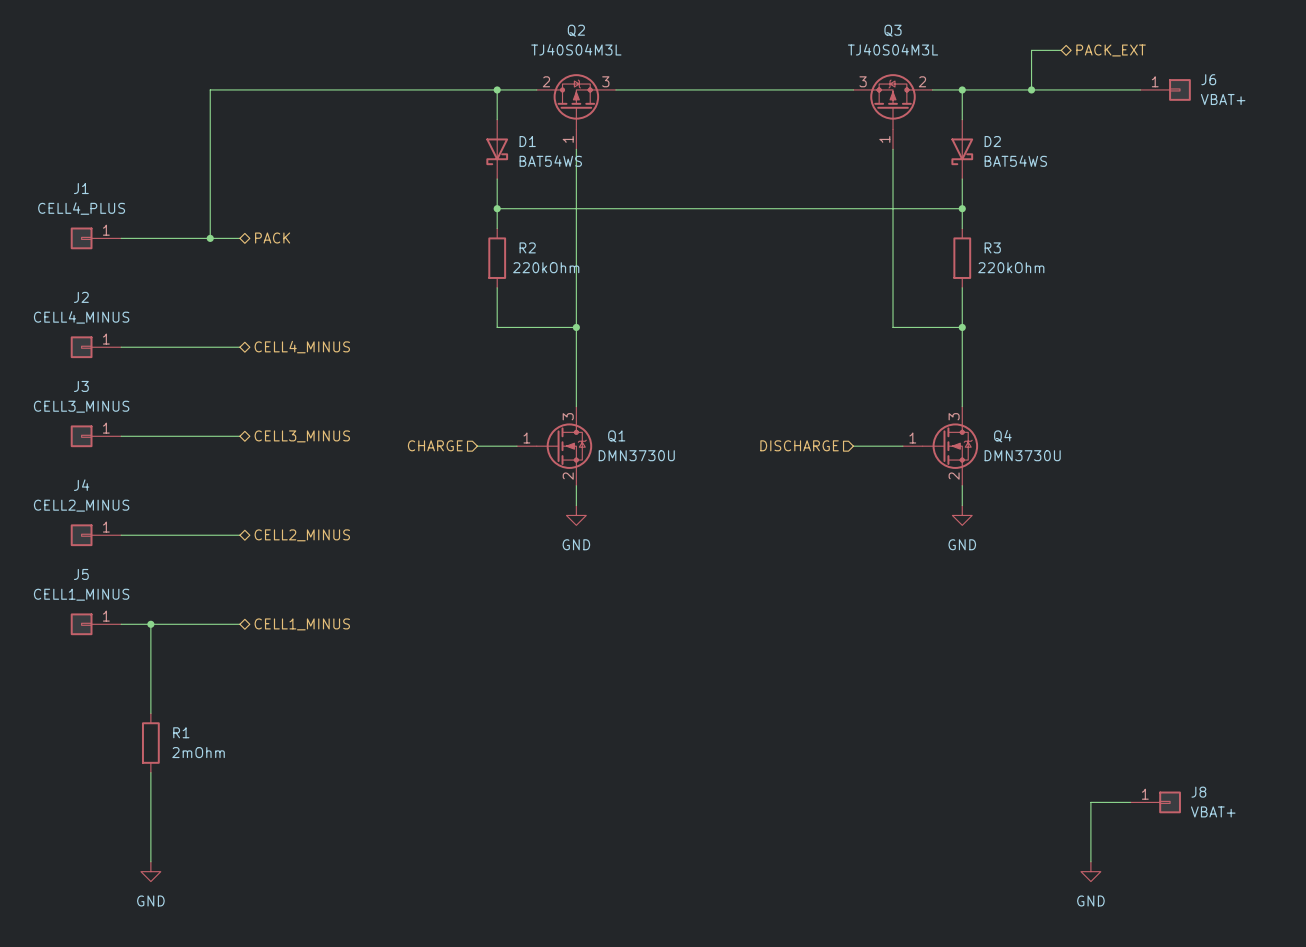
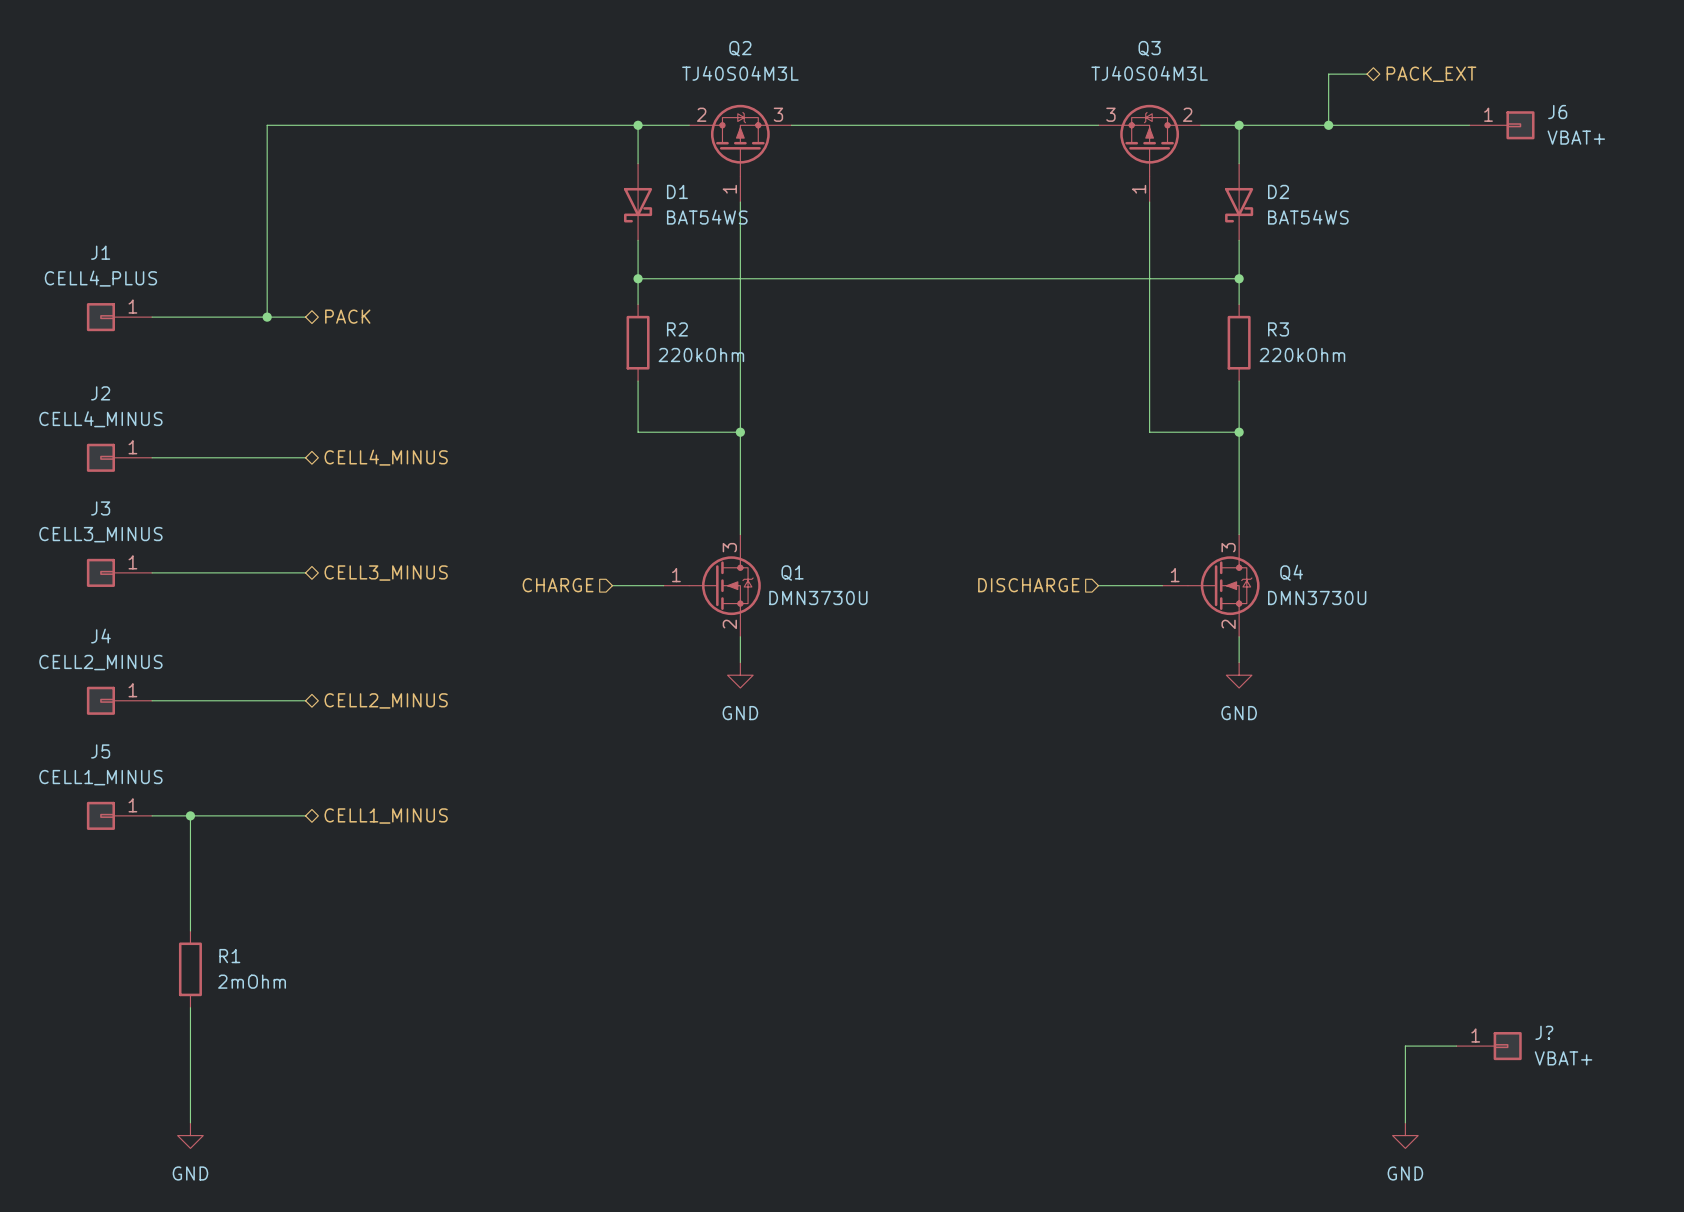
J8 name: J8 (1198, 792) -> J? (1544, 1032)

